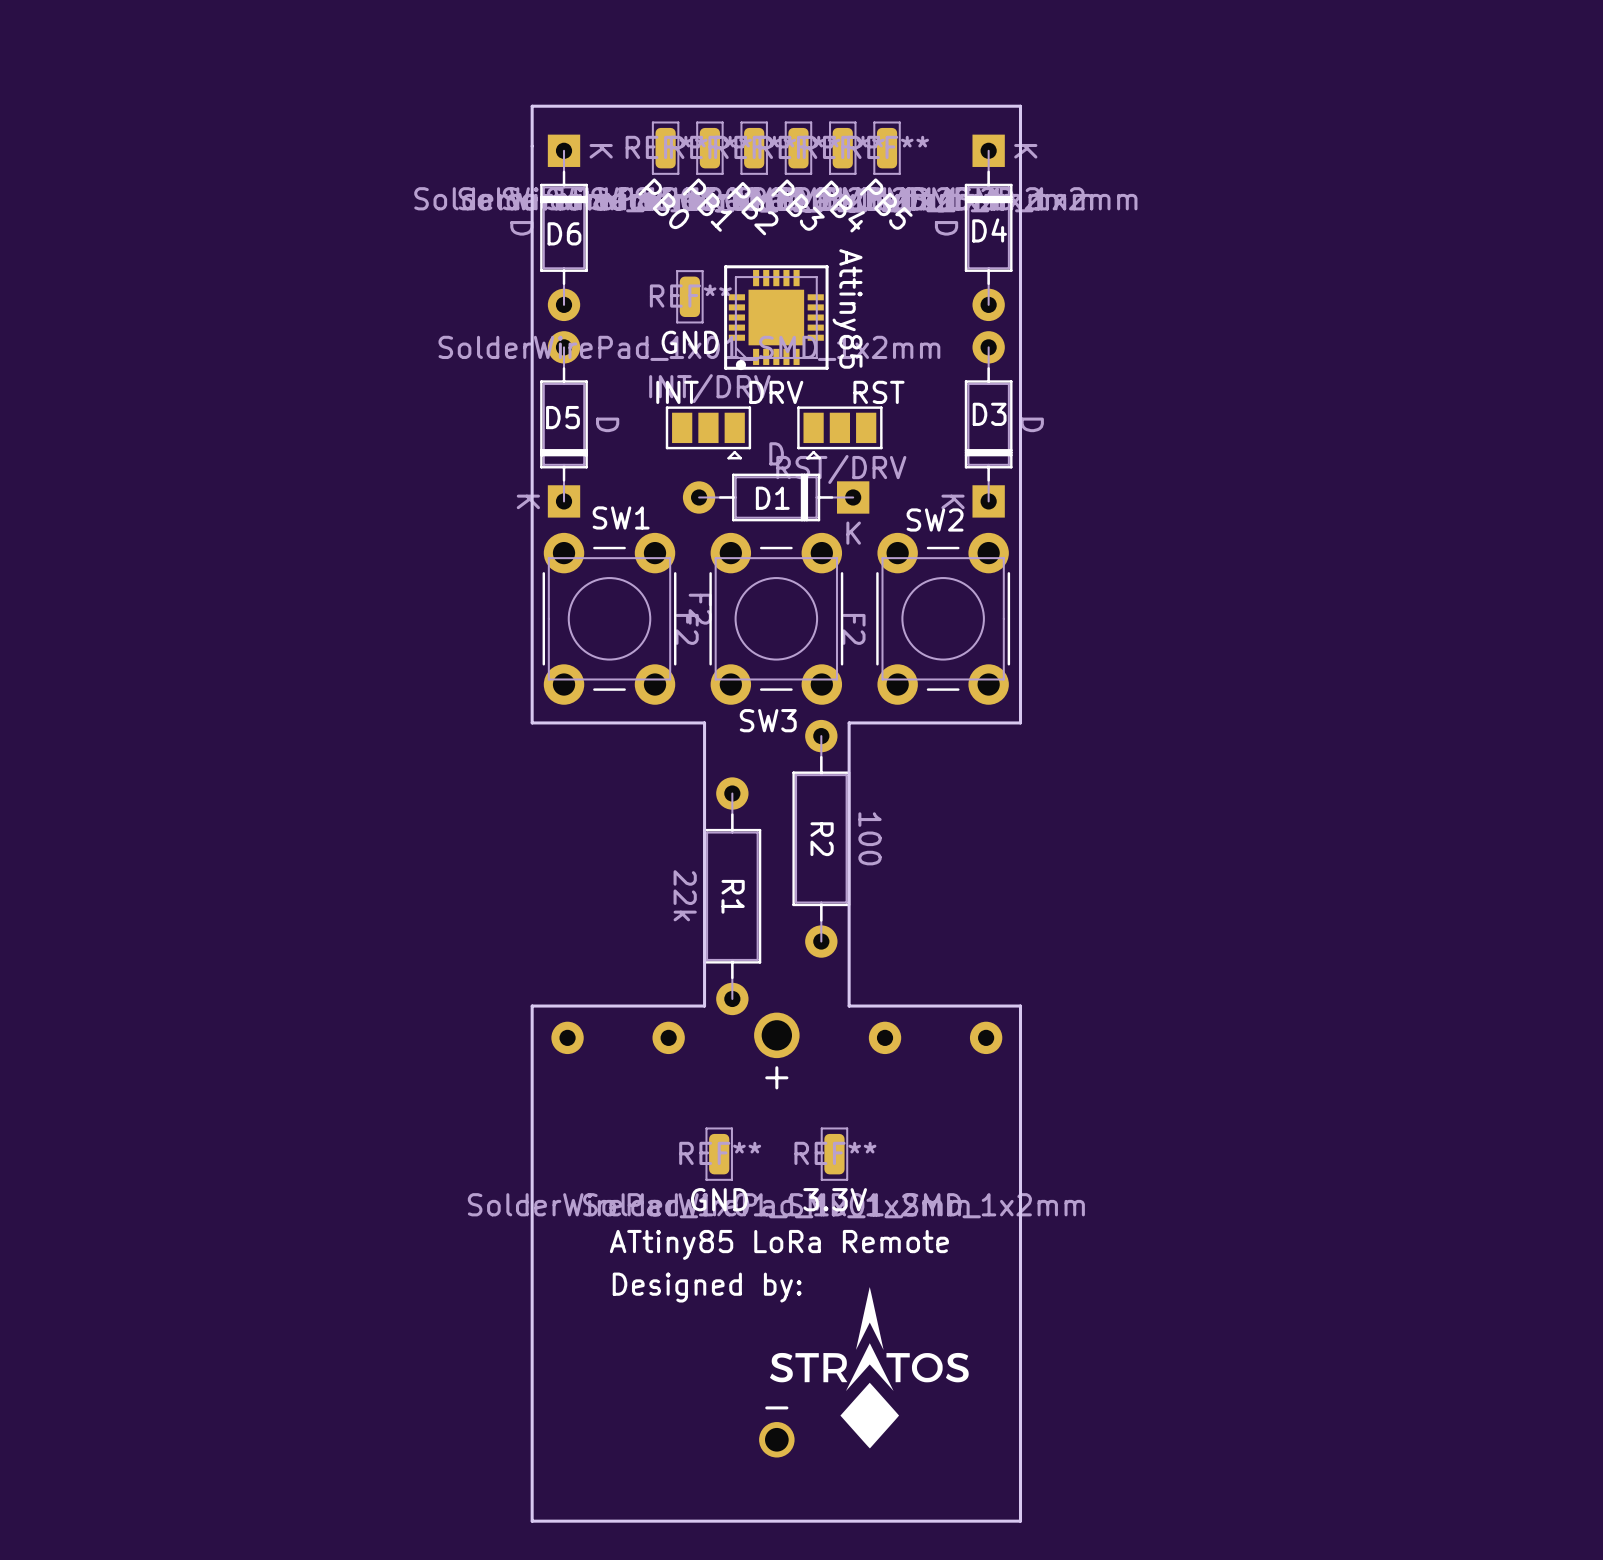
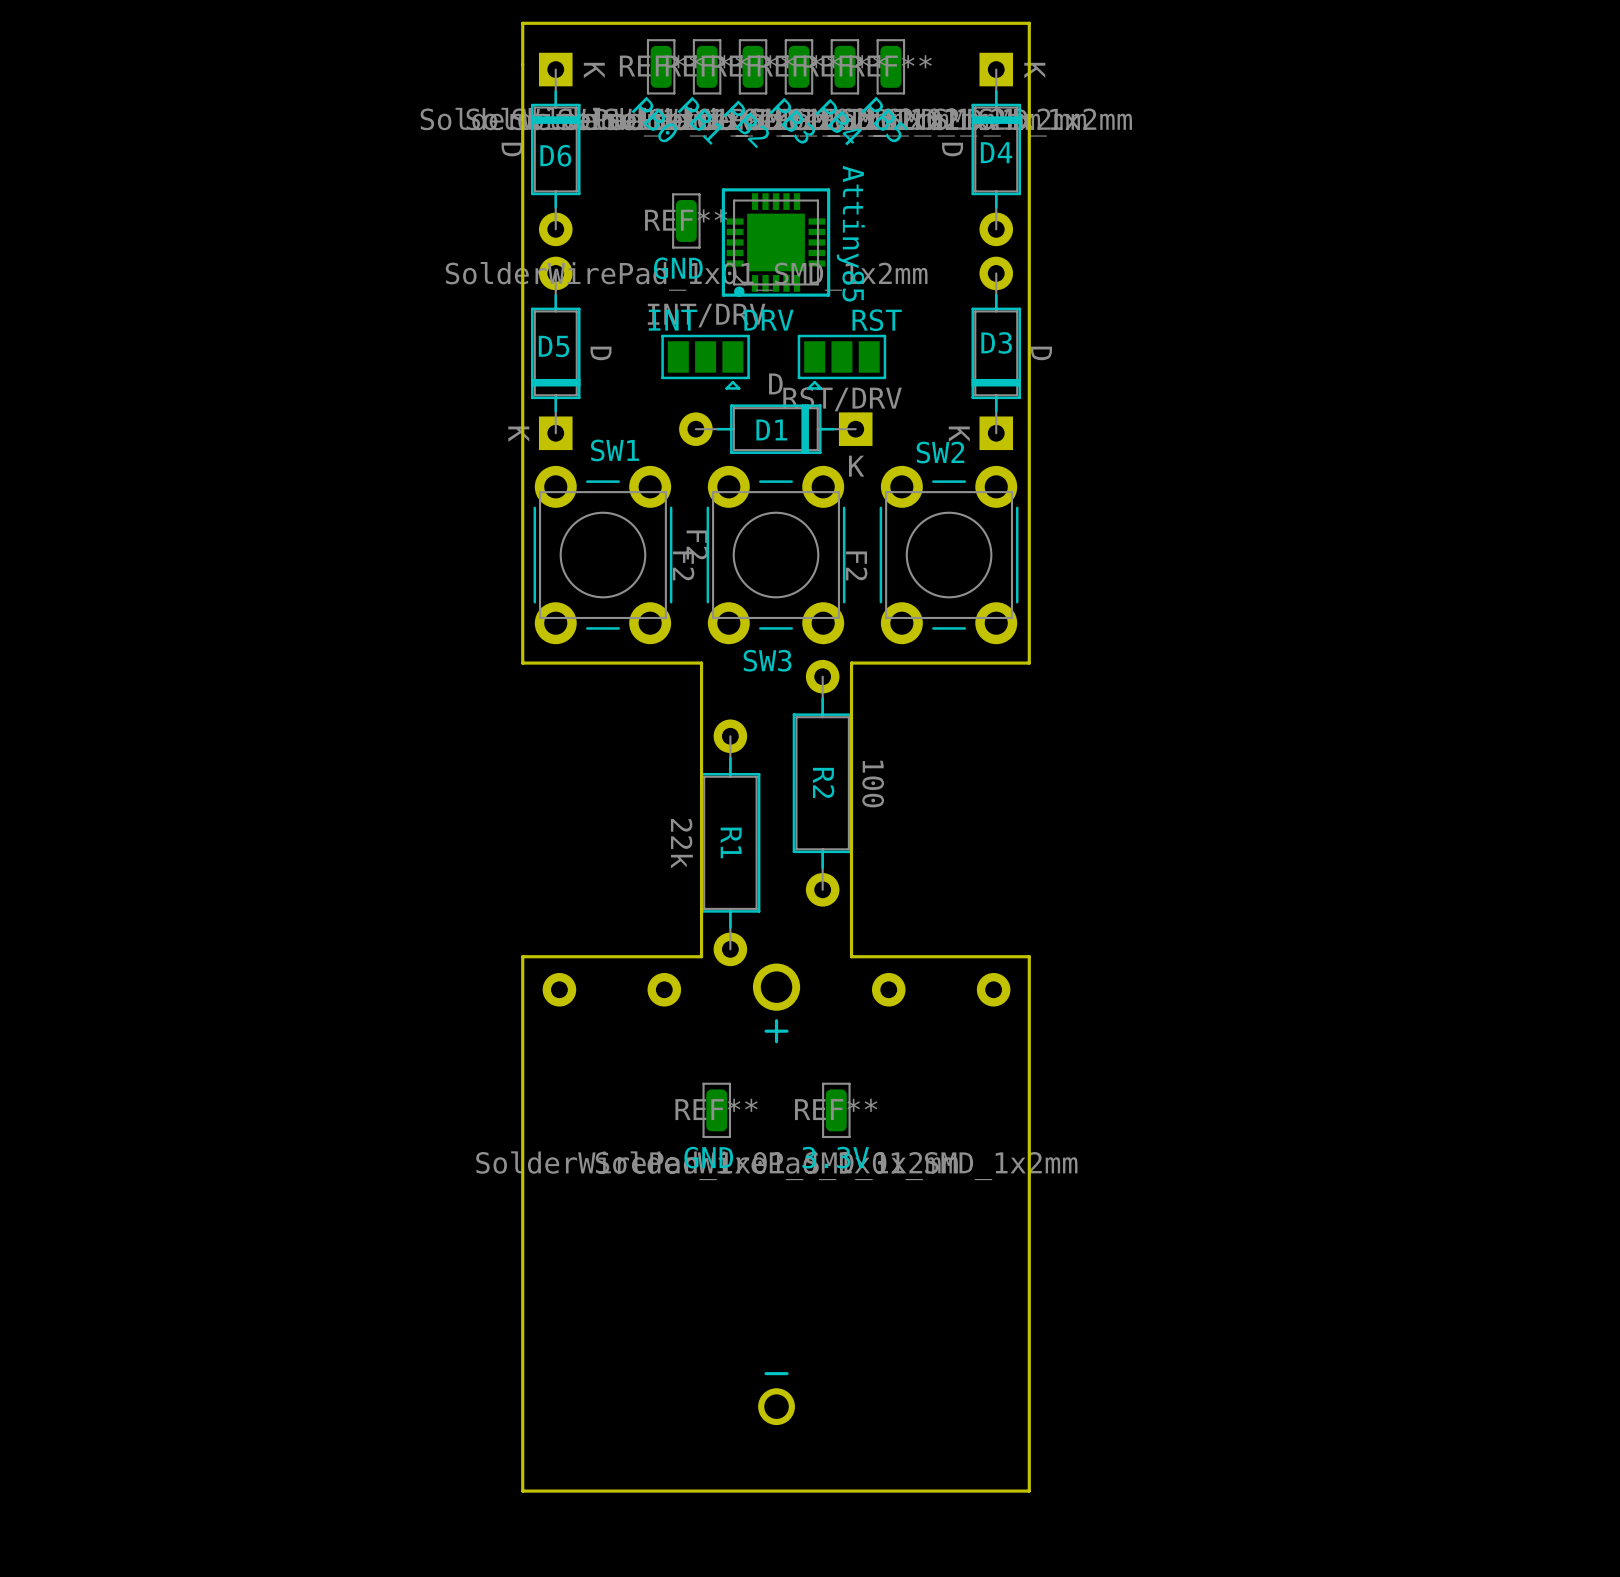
text: ATtiny85 LoRa Remote (779, 1244) -> none
text: Designed by: (707, 1287) -> none
drawing: [769, 1287, 969, 1449] -> none

